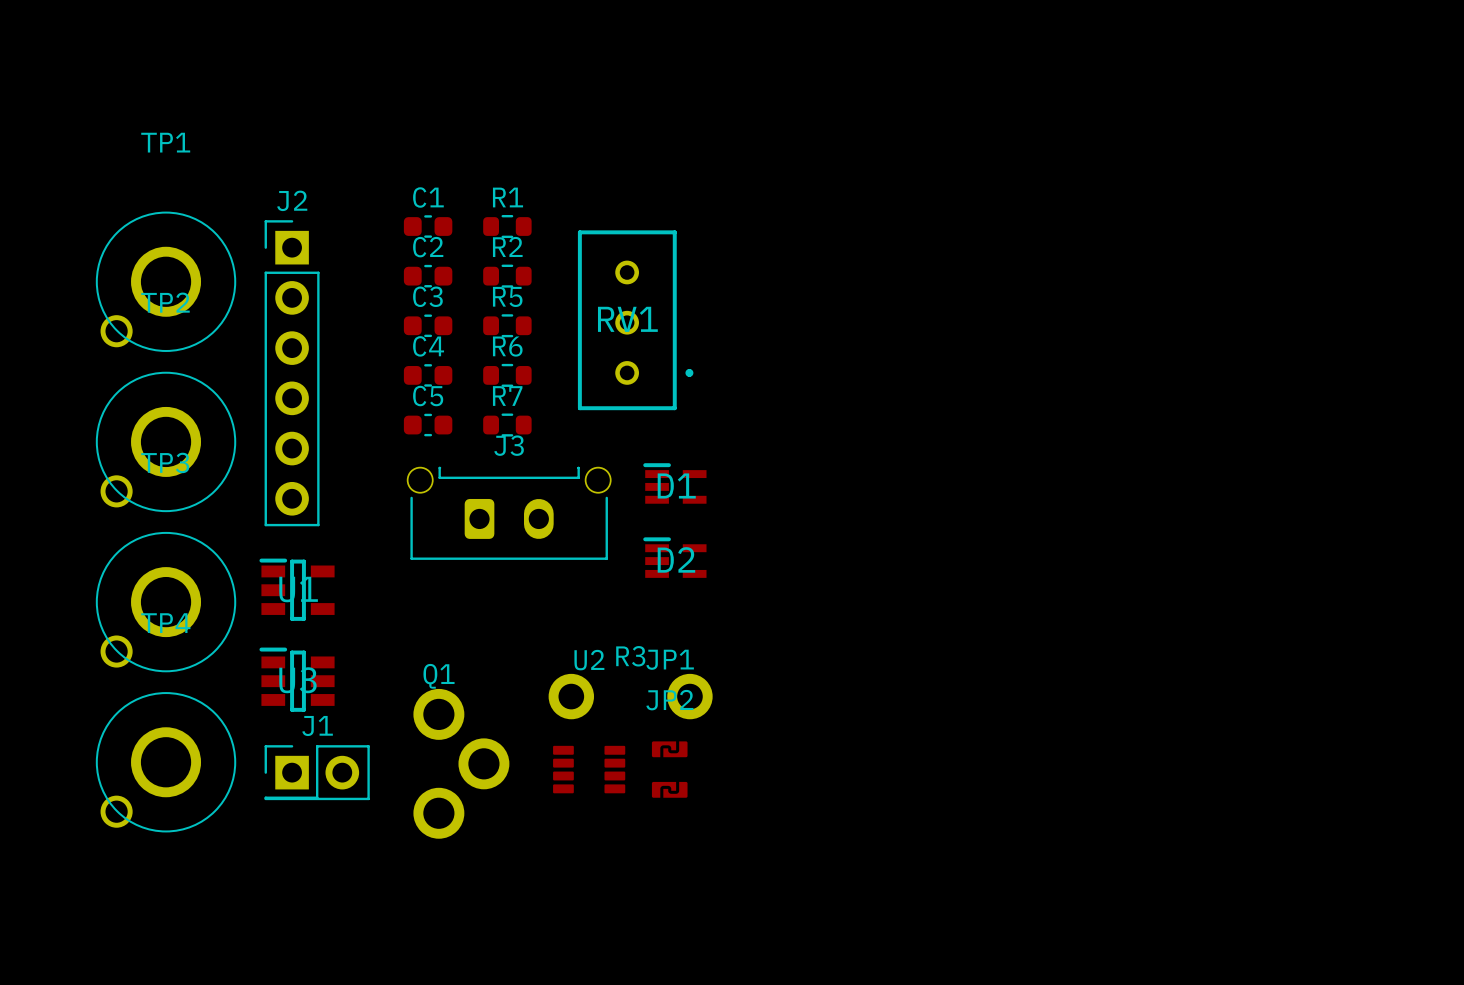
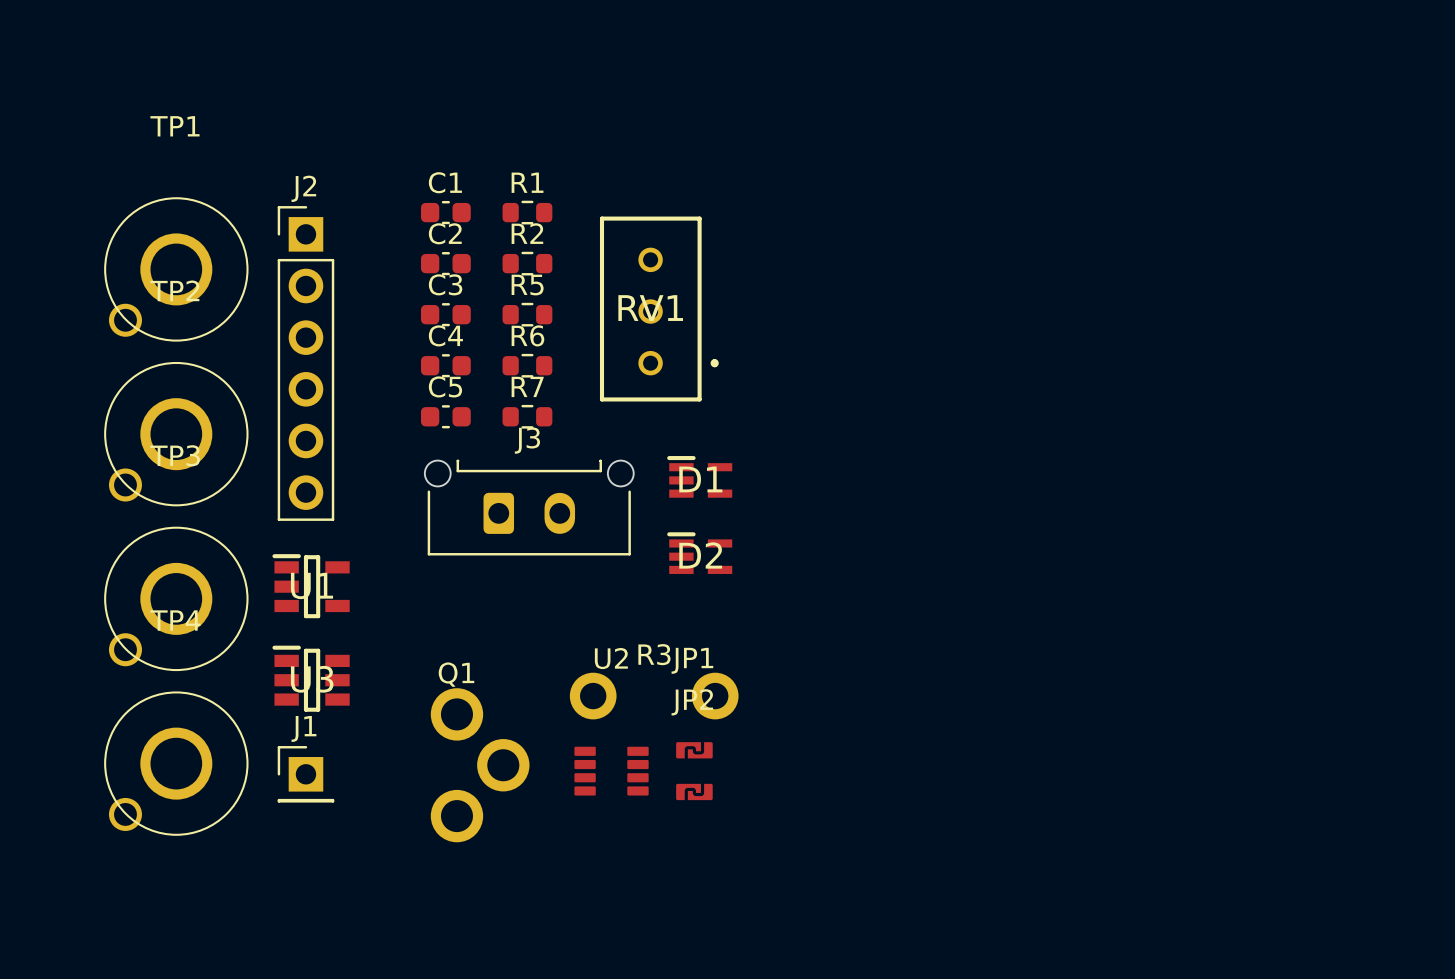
J1 footprint: [264, 745, 370, 801] -> [277, 746, 335, 803]

